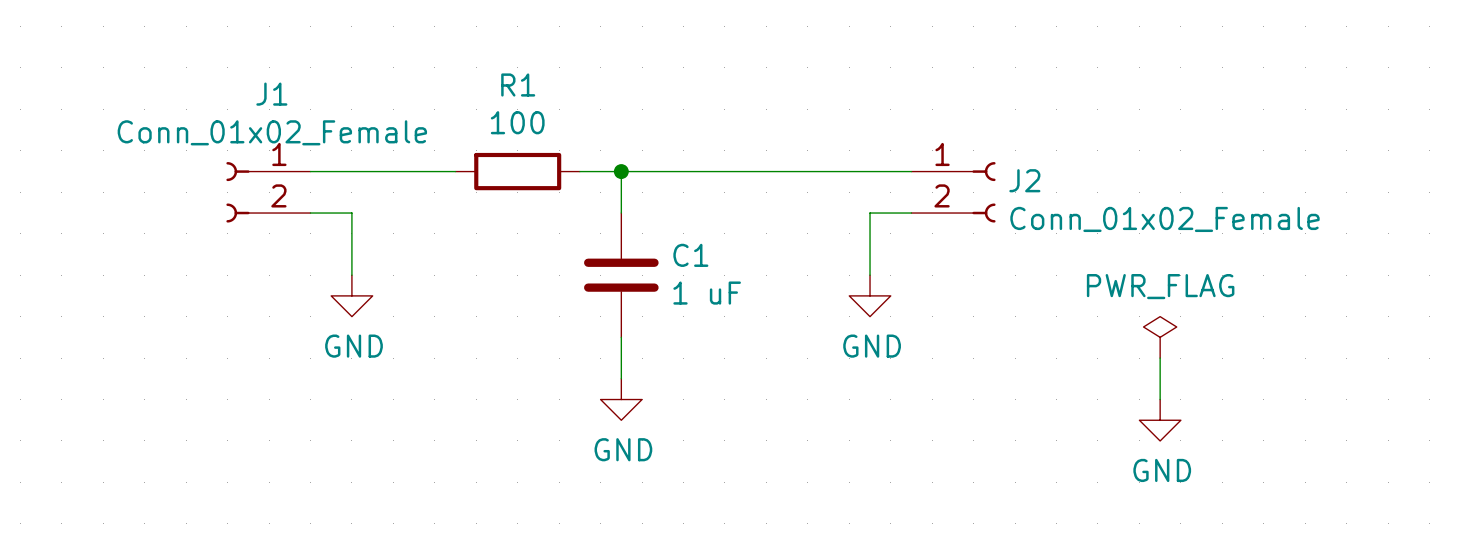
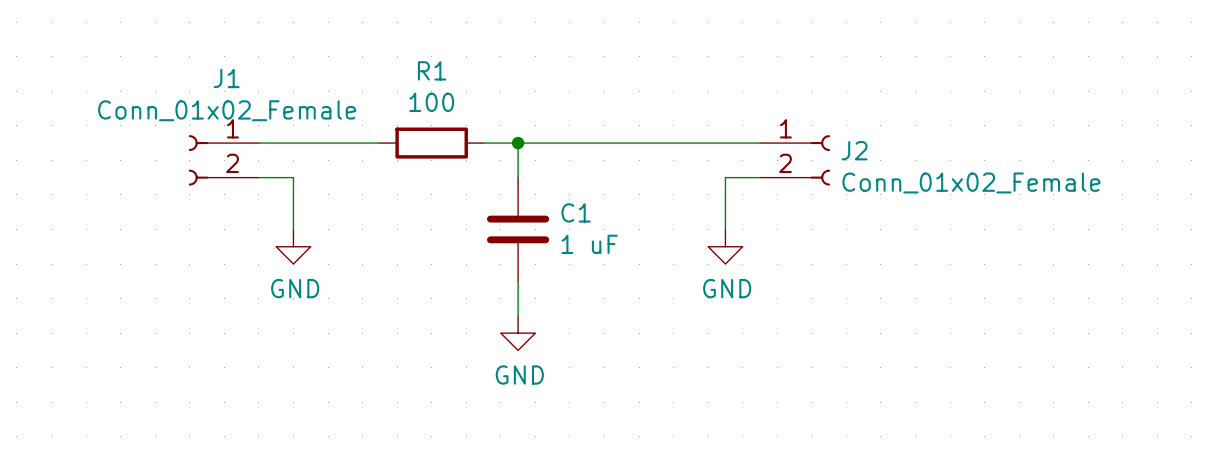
power symbol: PWR_FLAG (1160, 337) -> none
wire: (1160, 358) (1160, 399) -> none
power symbol: GND (1160, 420) -> none

